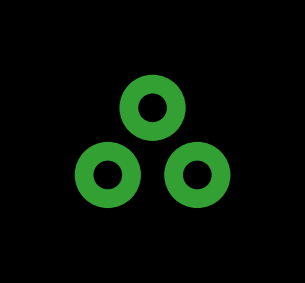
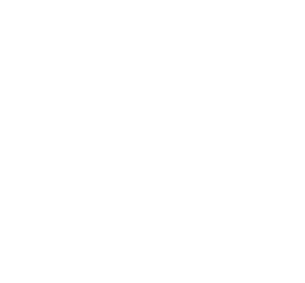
part: (152, 141) -> none

